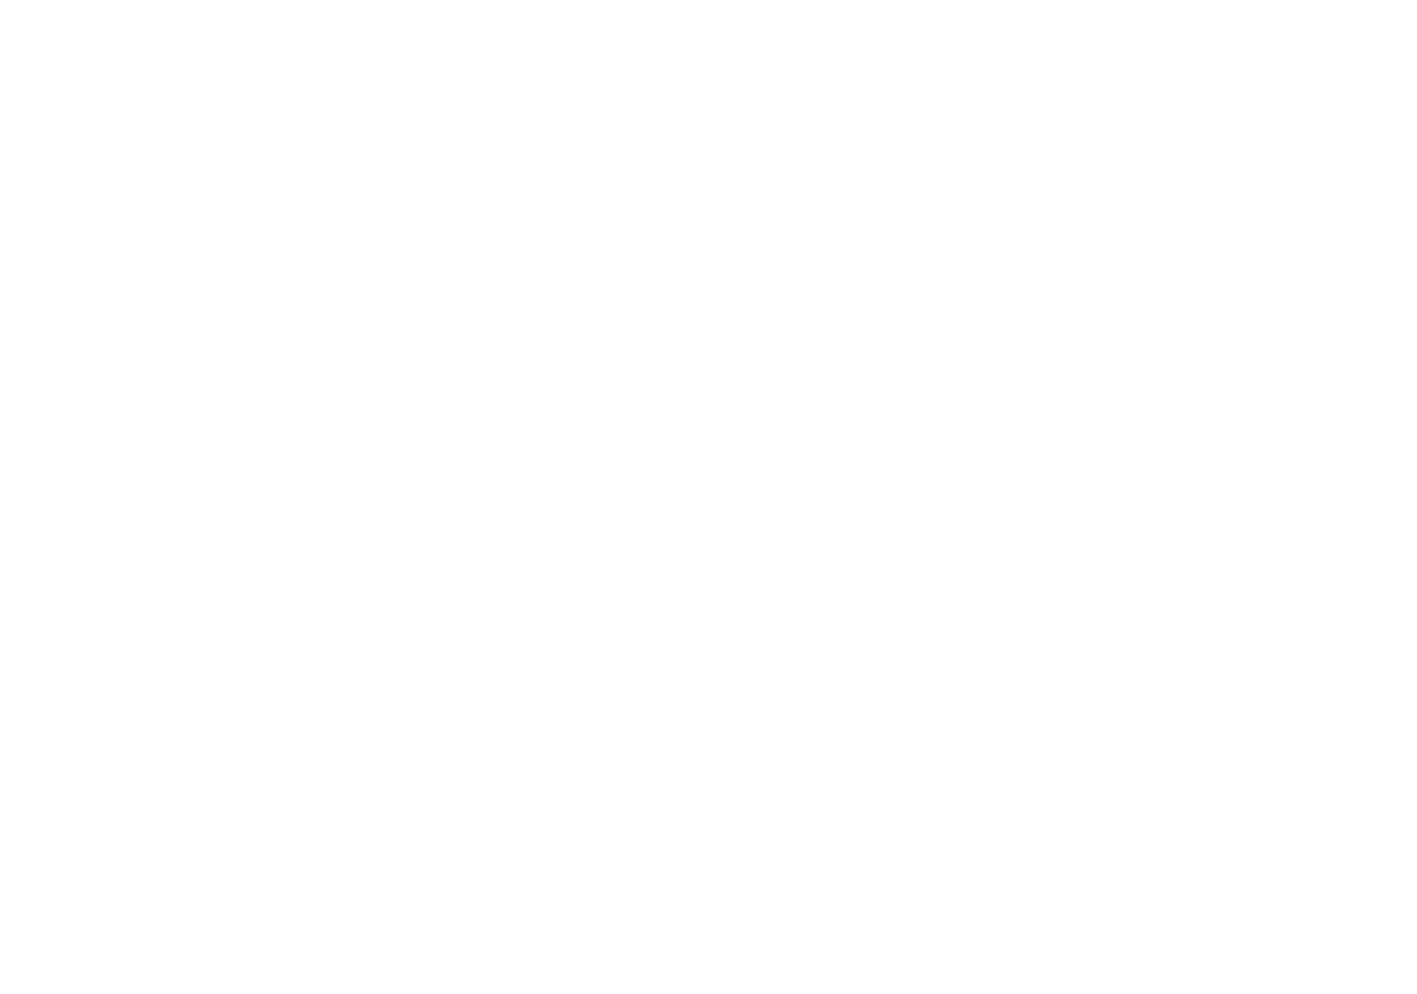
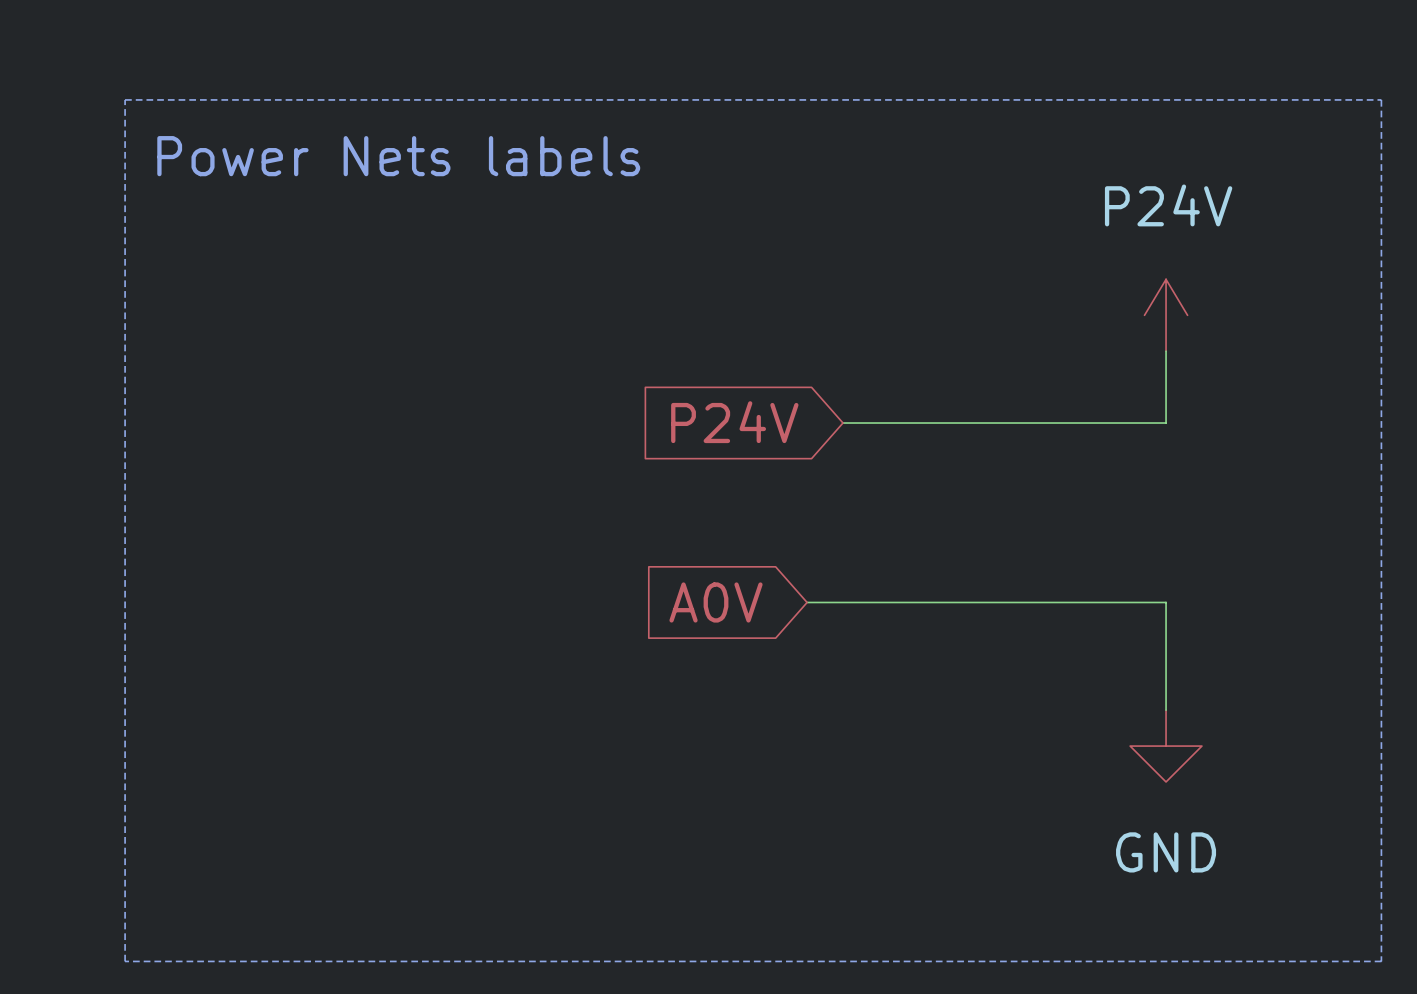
line: none -> (125, 99) (1381, 99) (1381, 961) (125, 961) (125, 99)
text: none -> Power Nets labels (398, 156)
power symbol: none -> P24V (1166, 315)
wire: none -> (1166, 351) (1166, 423) (842, 423)
global label: none -> P24V (734, 422)
global label: none -> A0V (716, 602)
wire: none -> (807, 602) (1166, 602) (1166, 710)
power symbol: none -> GND (1166, 746)

